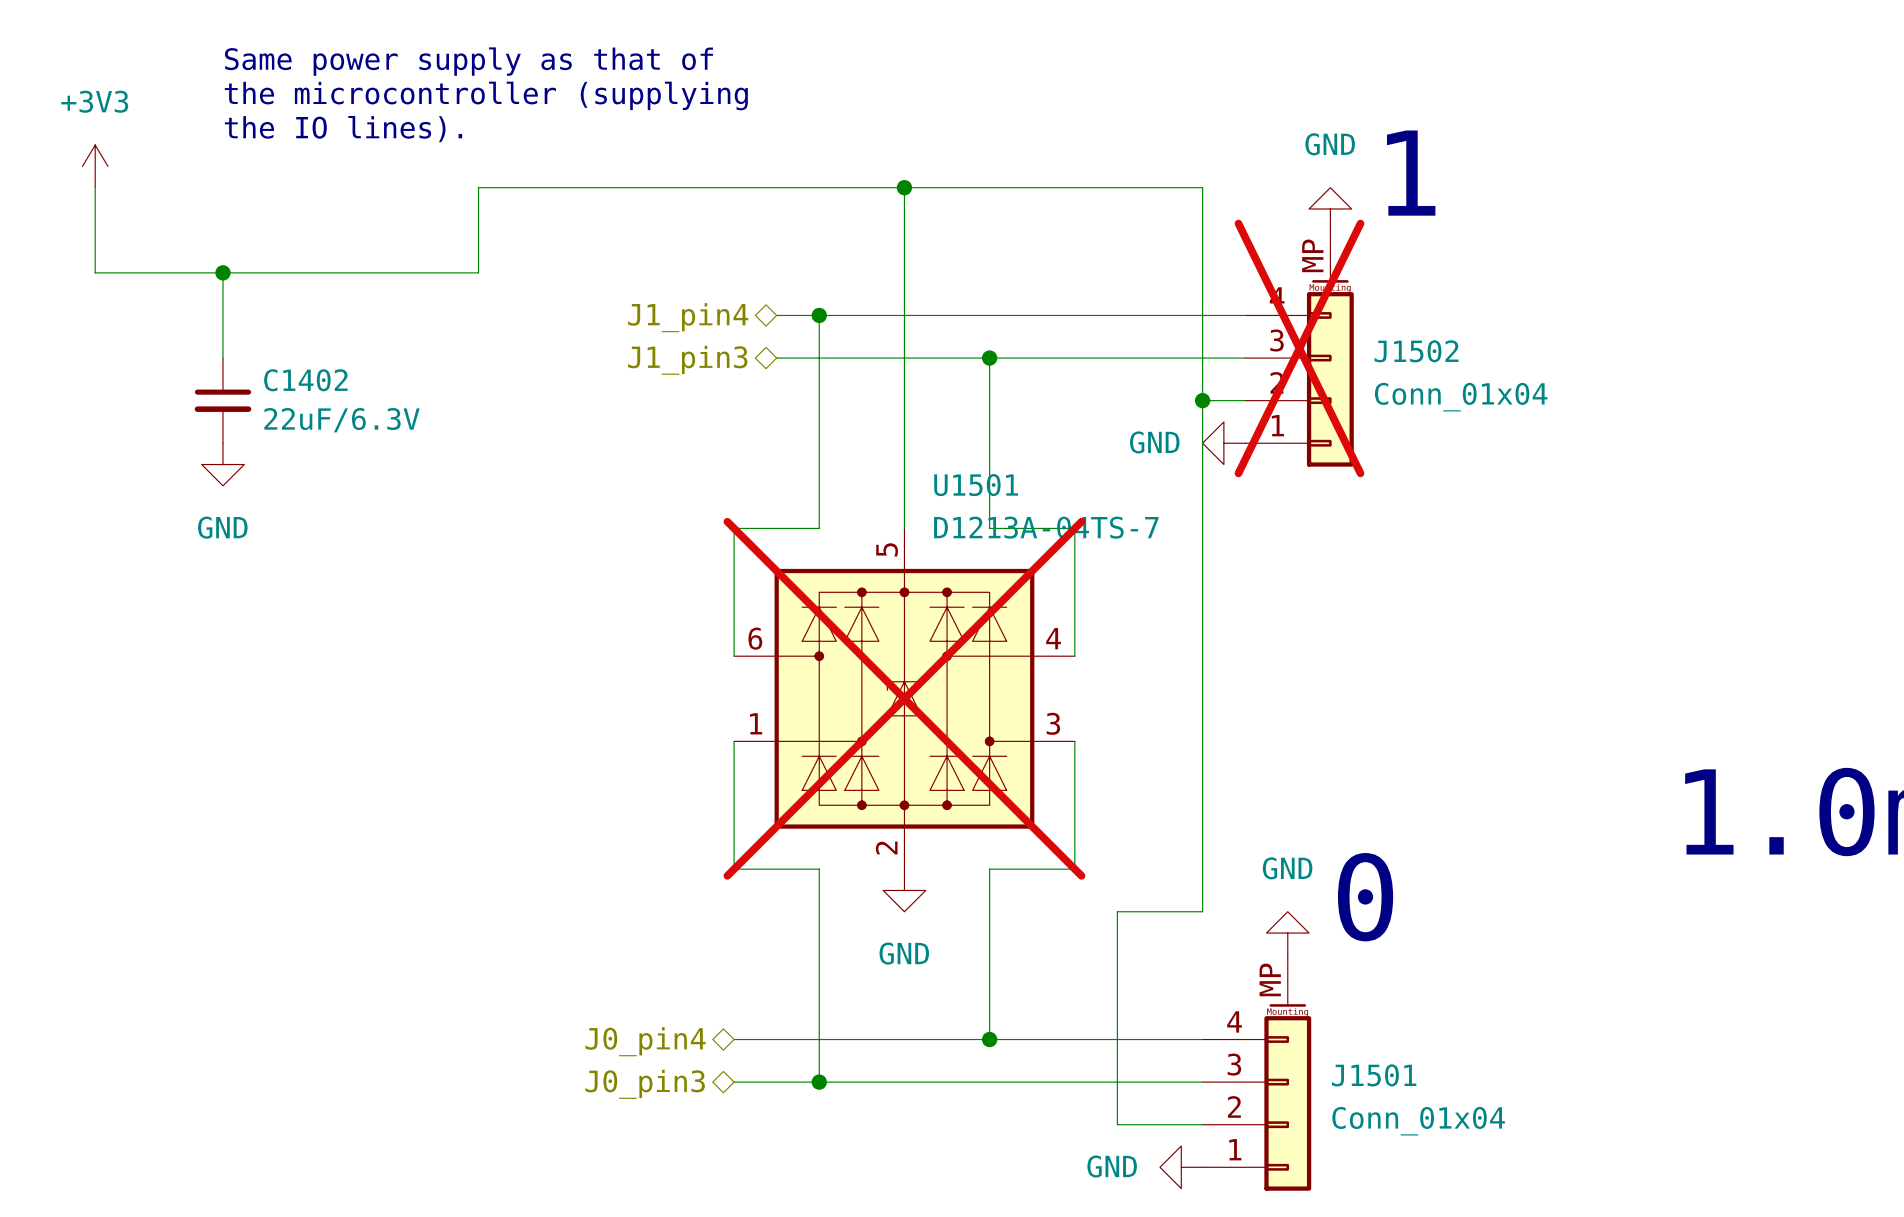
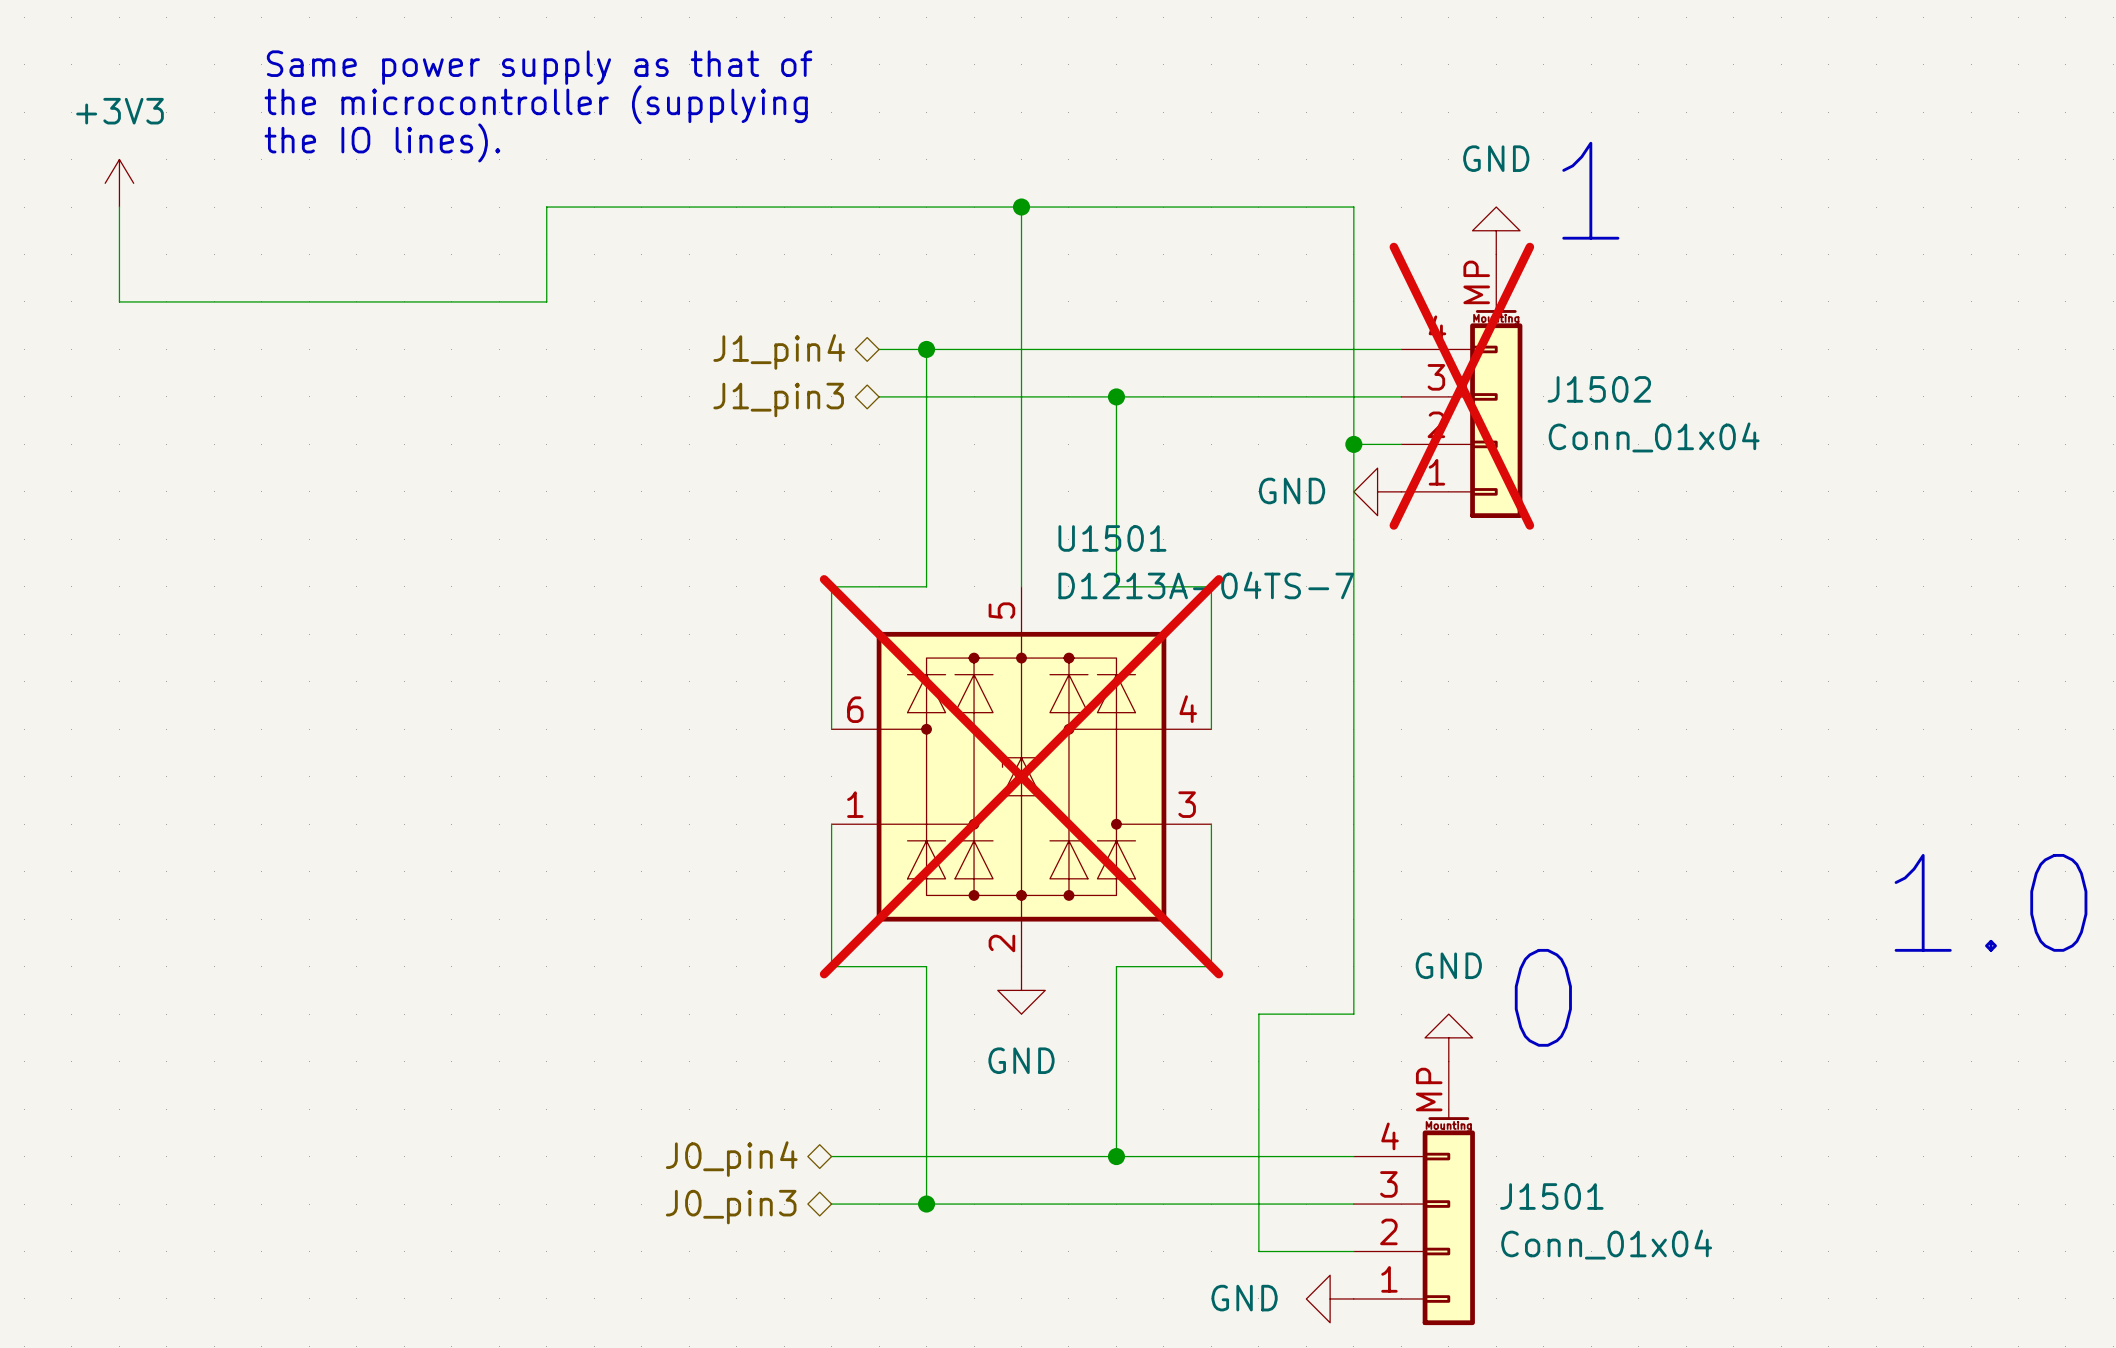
wire: (222, 272) (222, 358) -> none
junction: (222, 272) -> none
C1402: 22uF/6.3V (222, 400) -> none
power symbol: GND (222, 464) -> none

